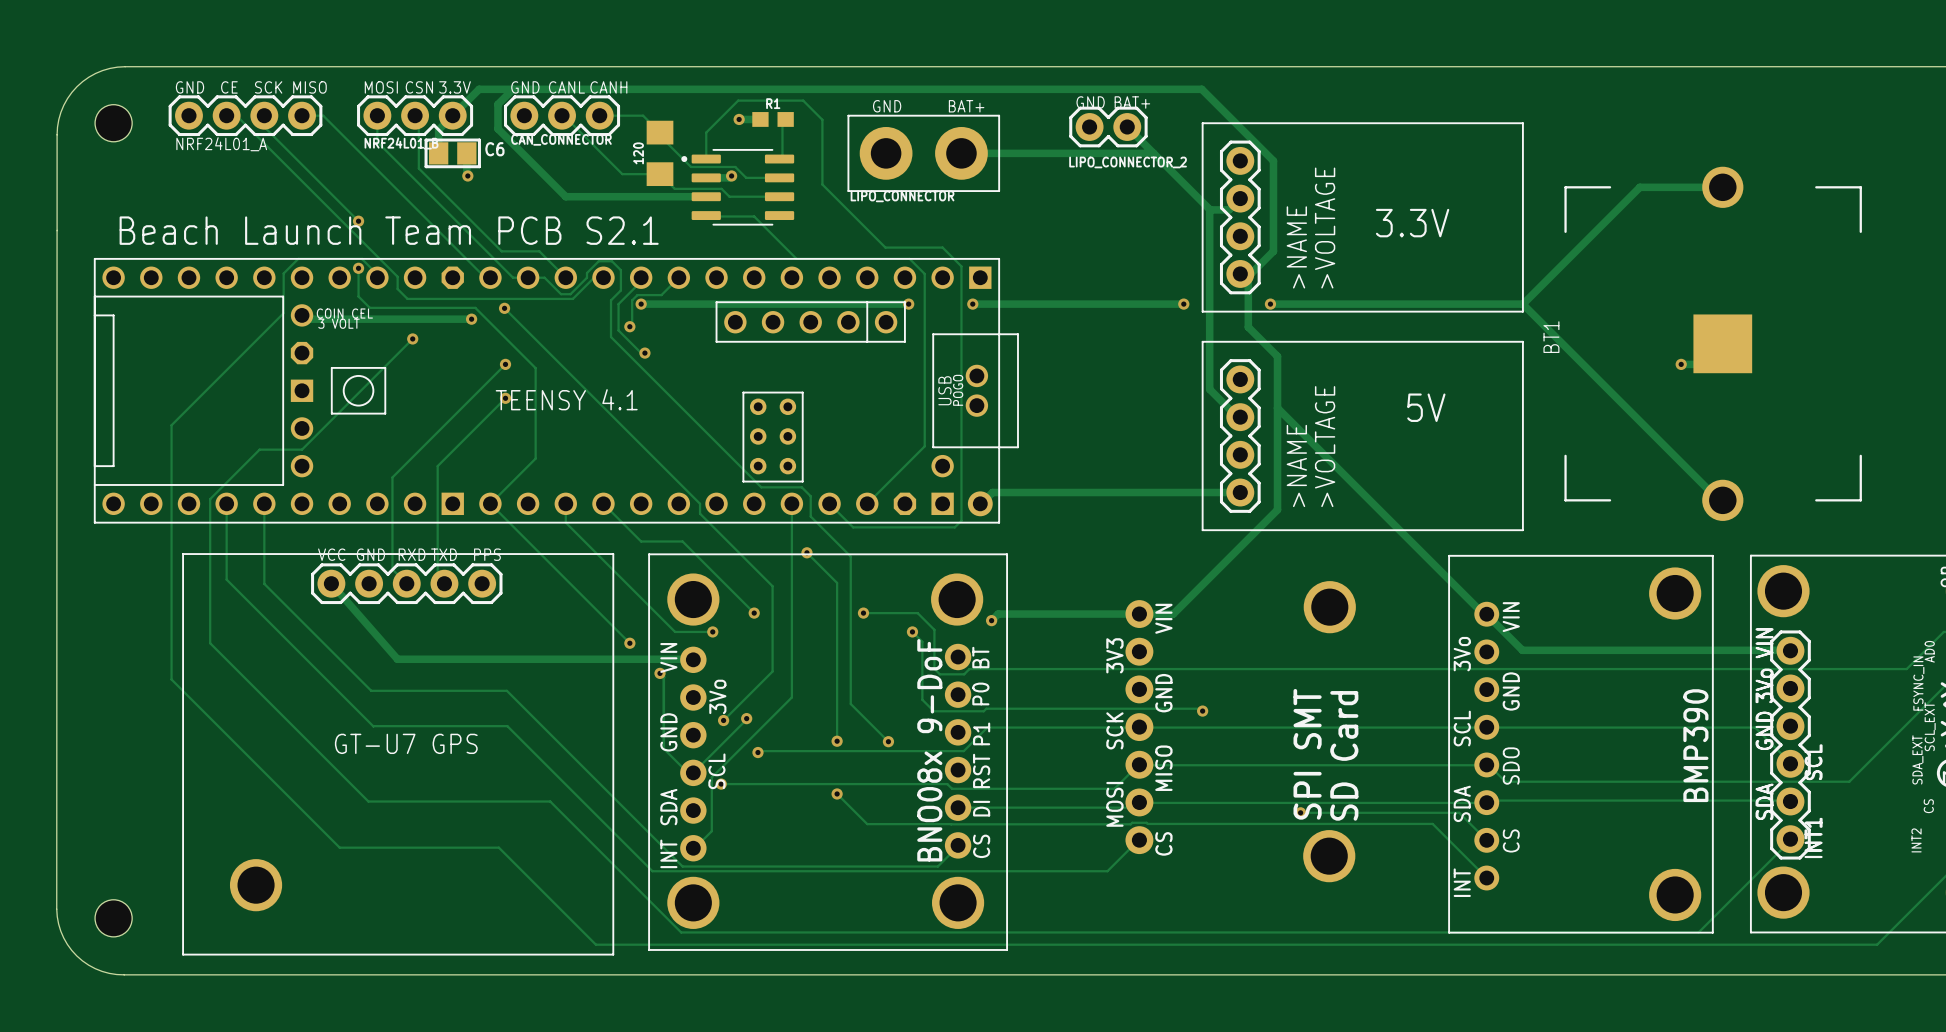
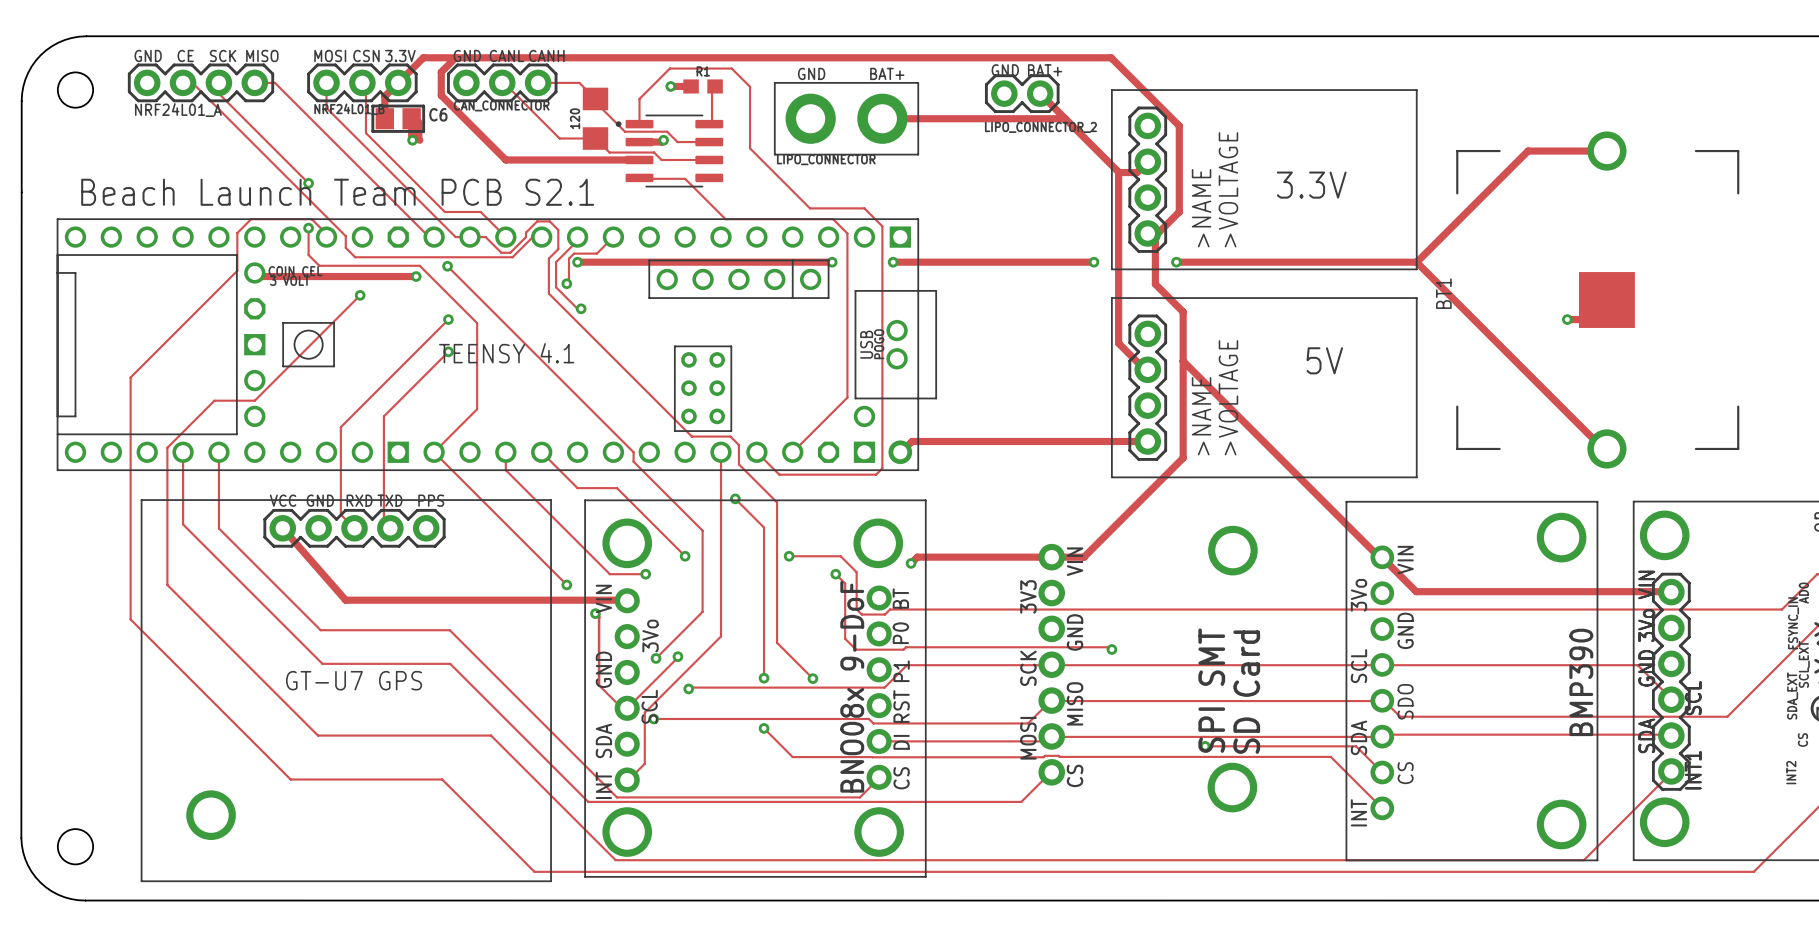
track: none -> (418, 122) (419, 140)

